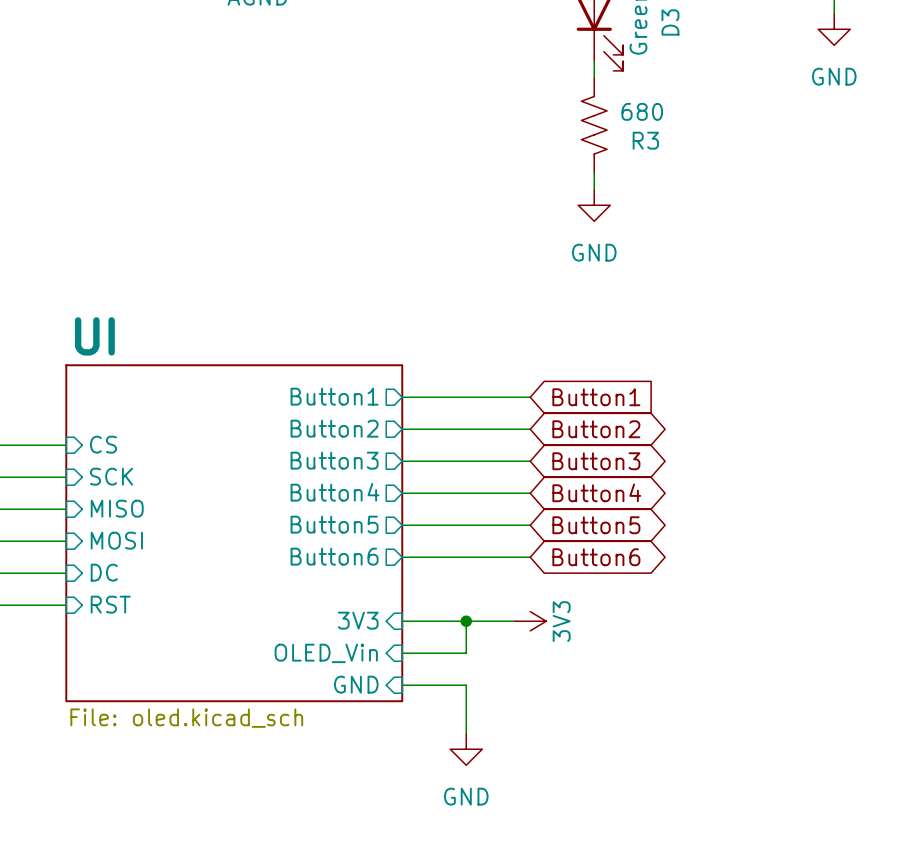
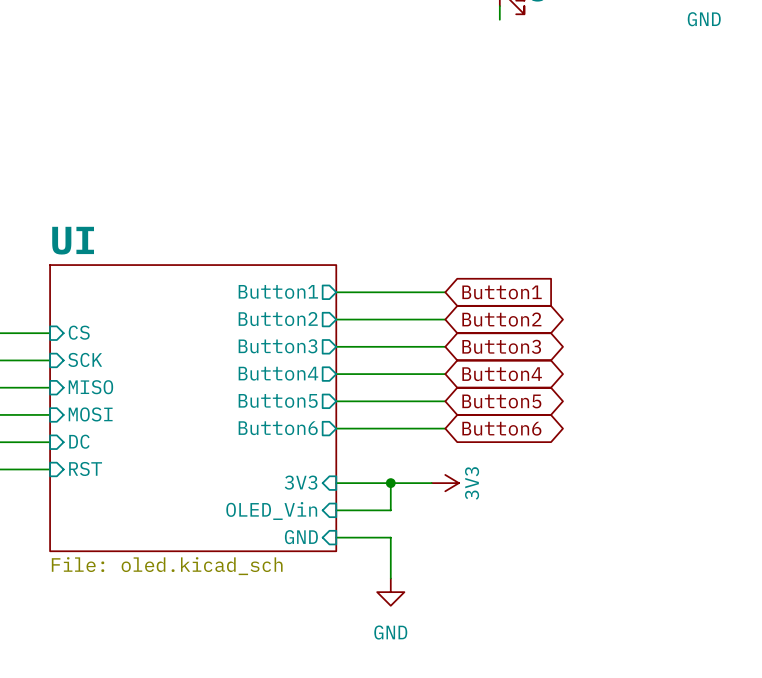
R3: 680 (594, 125) -> none
wire: (594, 173) (594, 189) -> none
power symbol: GND (594, 205) -> none

